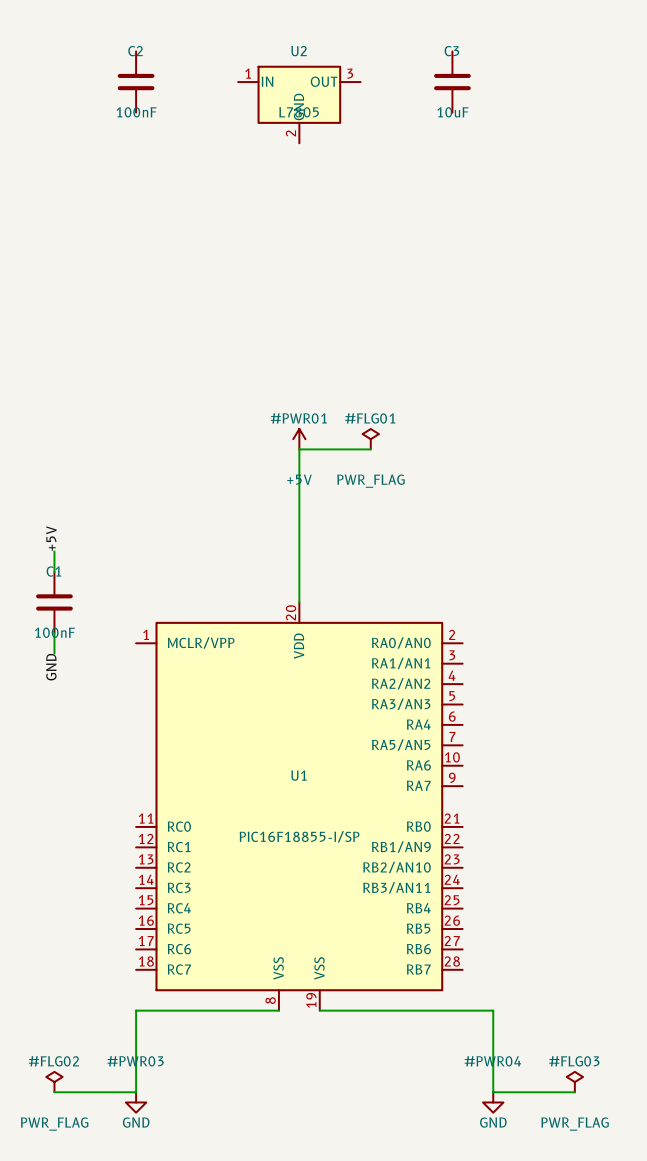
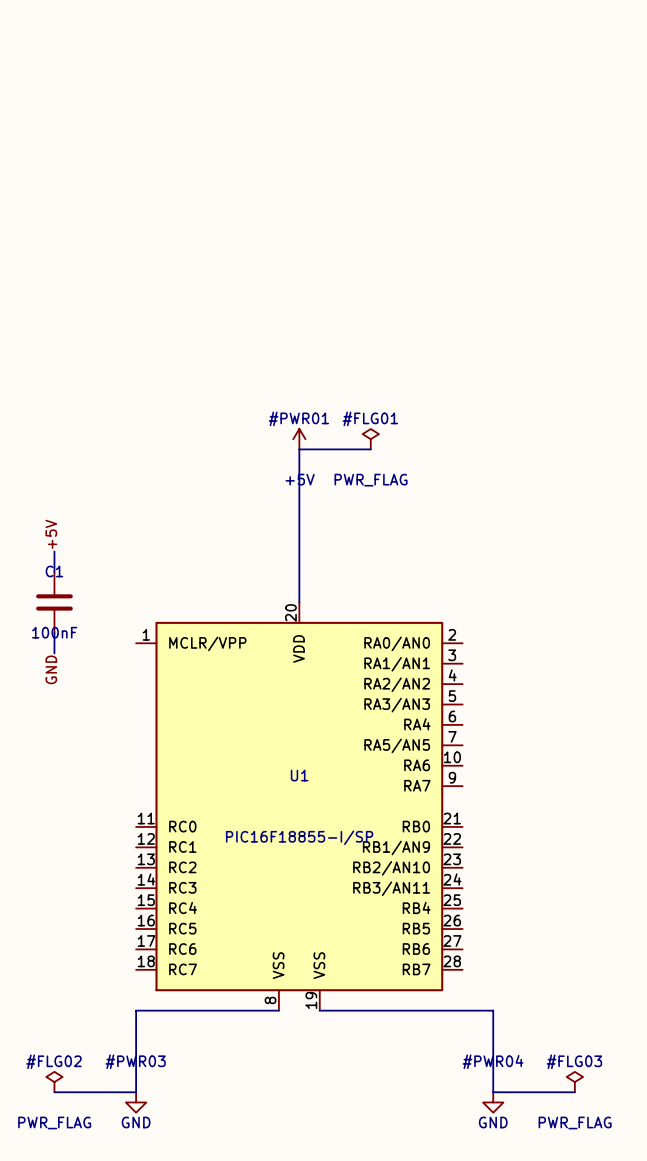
C2: 100nF (136, 82) -> none
C3: 10uF (452, 82) -> none
U2: L7805 (299, 104) -> none

